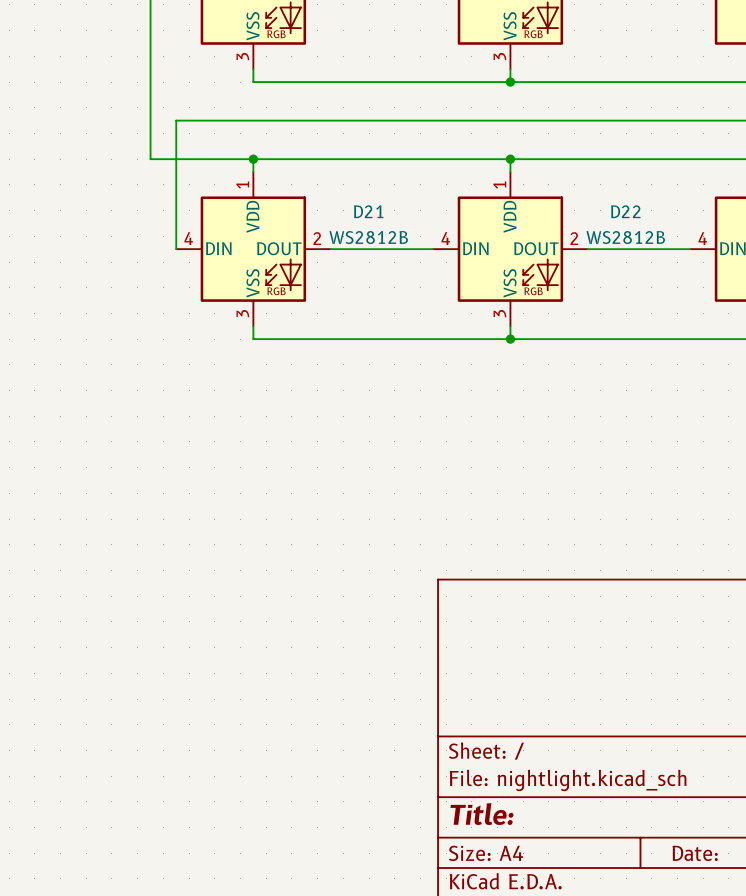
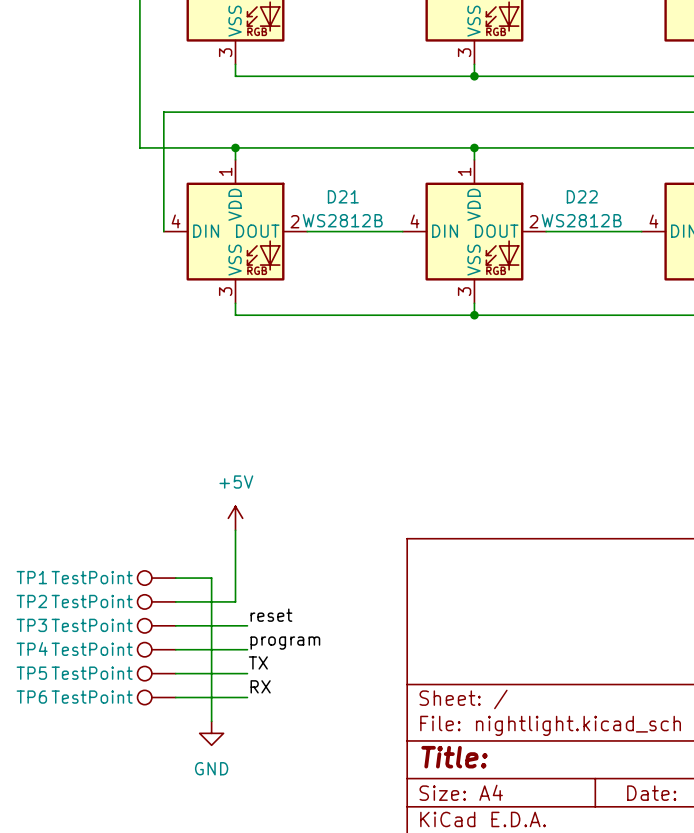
power symbol: none -> +5V (235, 518)
wire: none -> (235, 530) (235, 601) (175, 601)
TP1: none -> TestPoint (156, 578)
wire: none -> (175, 578) (211, 578) (211, 721)
TP2: none -> TestPoint (156, 601)
label: none -> reset (271, 615)
TP3: none -> TestPoint (156, 625)
wire: none -> (175, 625) (247, 625)
label: none -> program (285, 643)
TP4: none -> TestPoint (156, 649)
wire: none -> (175, 649) (247, 649)
label: none -> TX (258, 662)
TP5: none -> TestPoint (156, 673)
wire: none -> (175, 673) (247, 673)
label: none -> RX (260, 686)
TP6: none -> TestPoint (156, 697)
wire: none -> (175, 697) (247, 697)
power symbol: none -> GND (211, 733)

